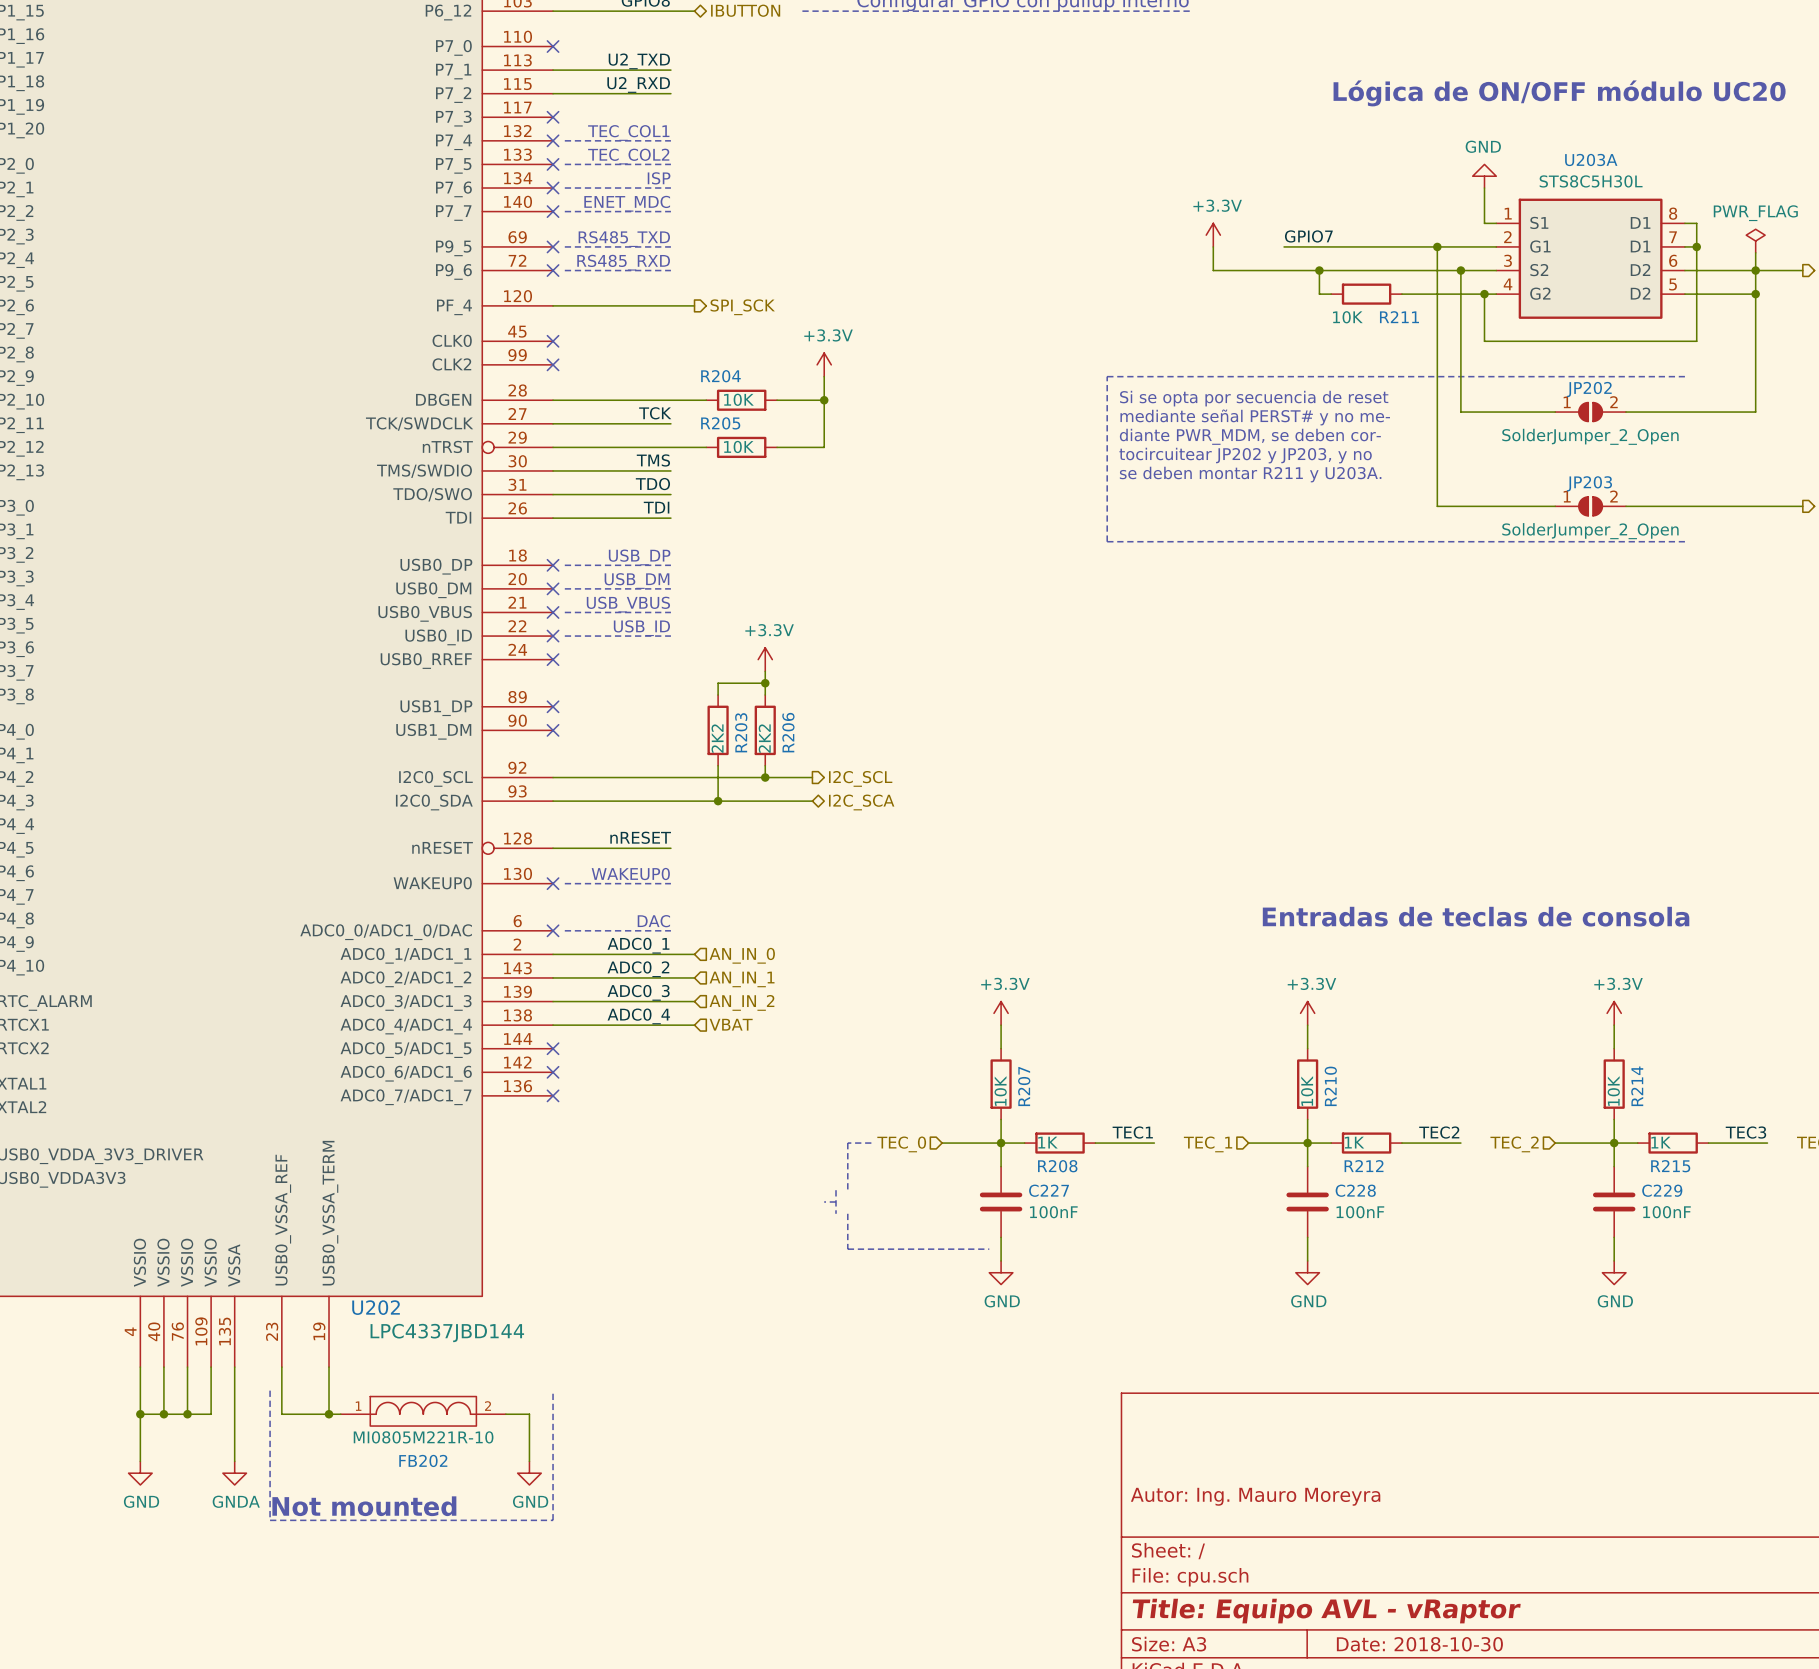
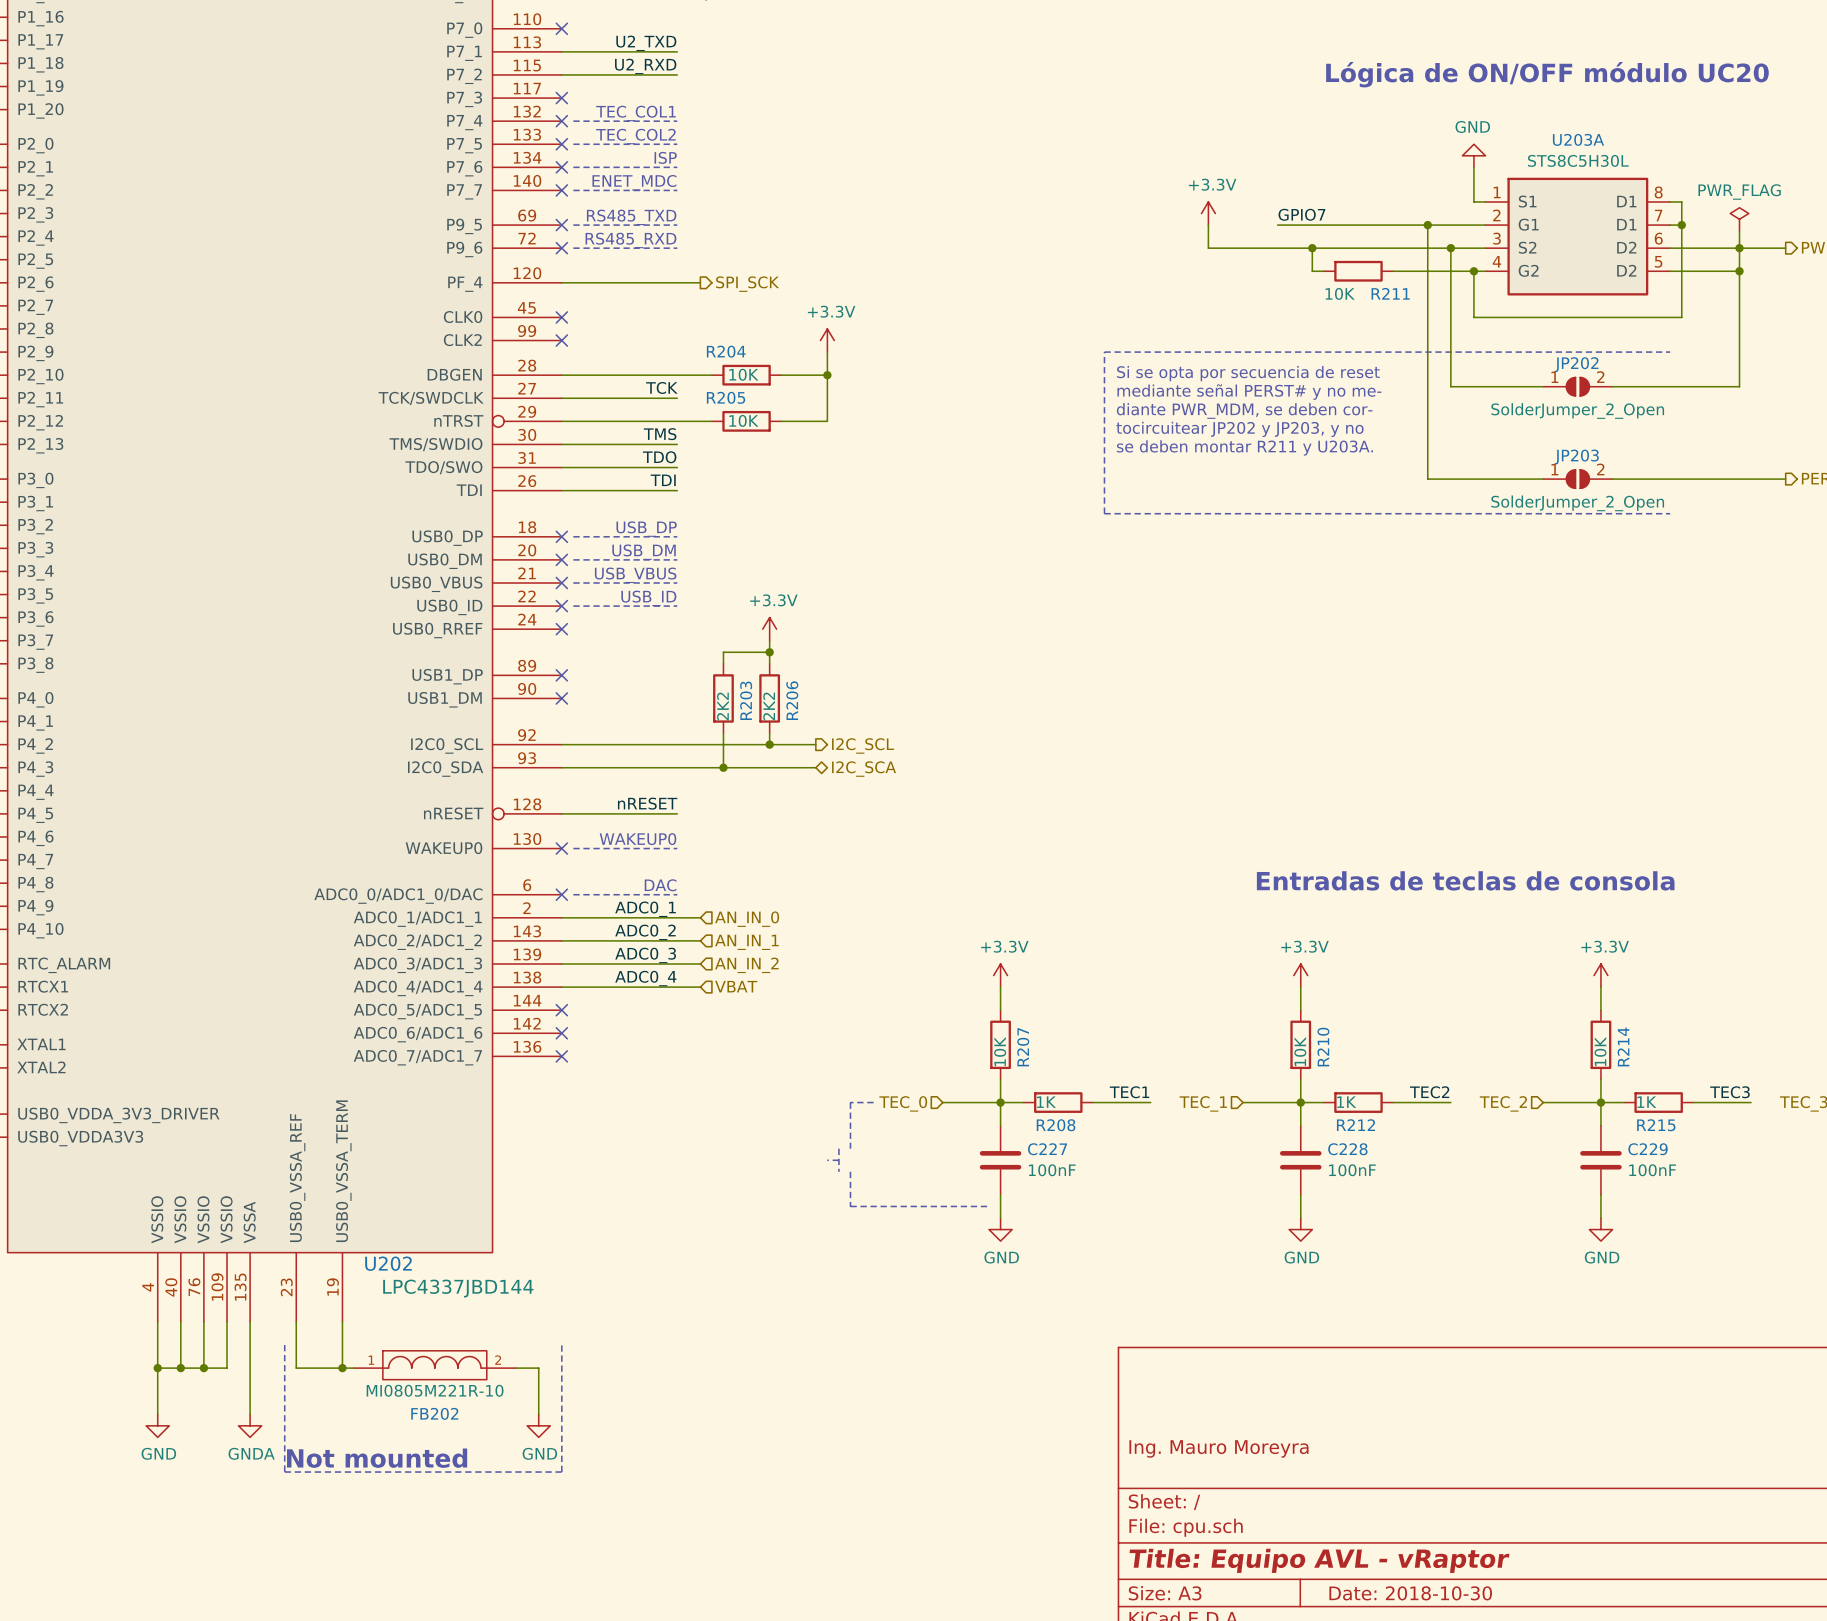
title block: Autor: Ing. Mauro Moreyra (1255, 1496) -> Ing. Mauro Moreyra (1218, 1448)

